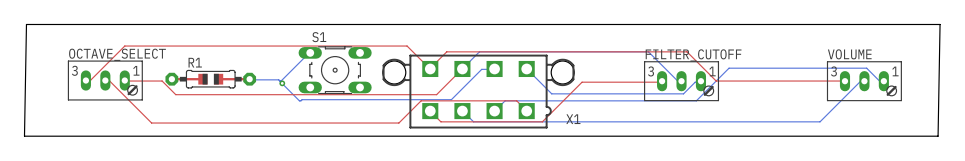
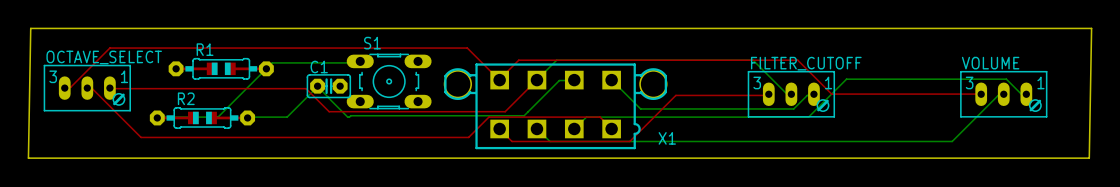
top track: (407, 46) (124, 46) (90, 79) (85, 80) -> (472, 53) (467, 48) (109, 48) (70, 87) (64, 88)
bottom track: (310, 52) (279, 81) -> none
bottom track: none -> (367, 62) (272, 62) (218, 117) (157, 117)
C1: none -> (328, 86)
R1 position: (210, 79) -> (221, 68)
bottom track: (249, 79) (278, 79) -> (247, 117) (287, 117) (317, 86) (323, 92)
top track: (105, 80) (109, 81) (151, 123) (398, 123) (403, 118) -> (87, 88) (92, 88) (141, 137) (468, 137)
OCTAVE_SELECT position: (105, 80) -> (87, 88)
top track: (124, 80) (162, 81) (175, 94) (436, 94) -> (109, 88) (306, 88) (329, 111) (505, 111) (506, 109)
via: (282, 83) -> none
R2: none -> (202, 117)

